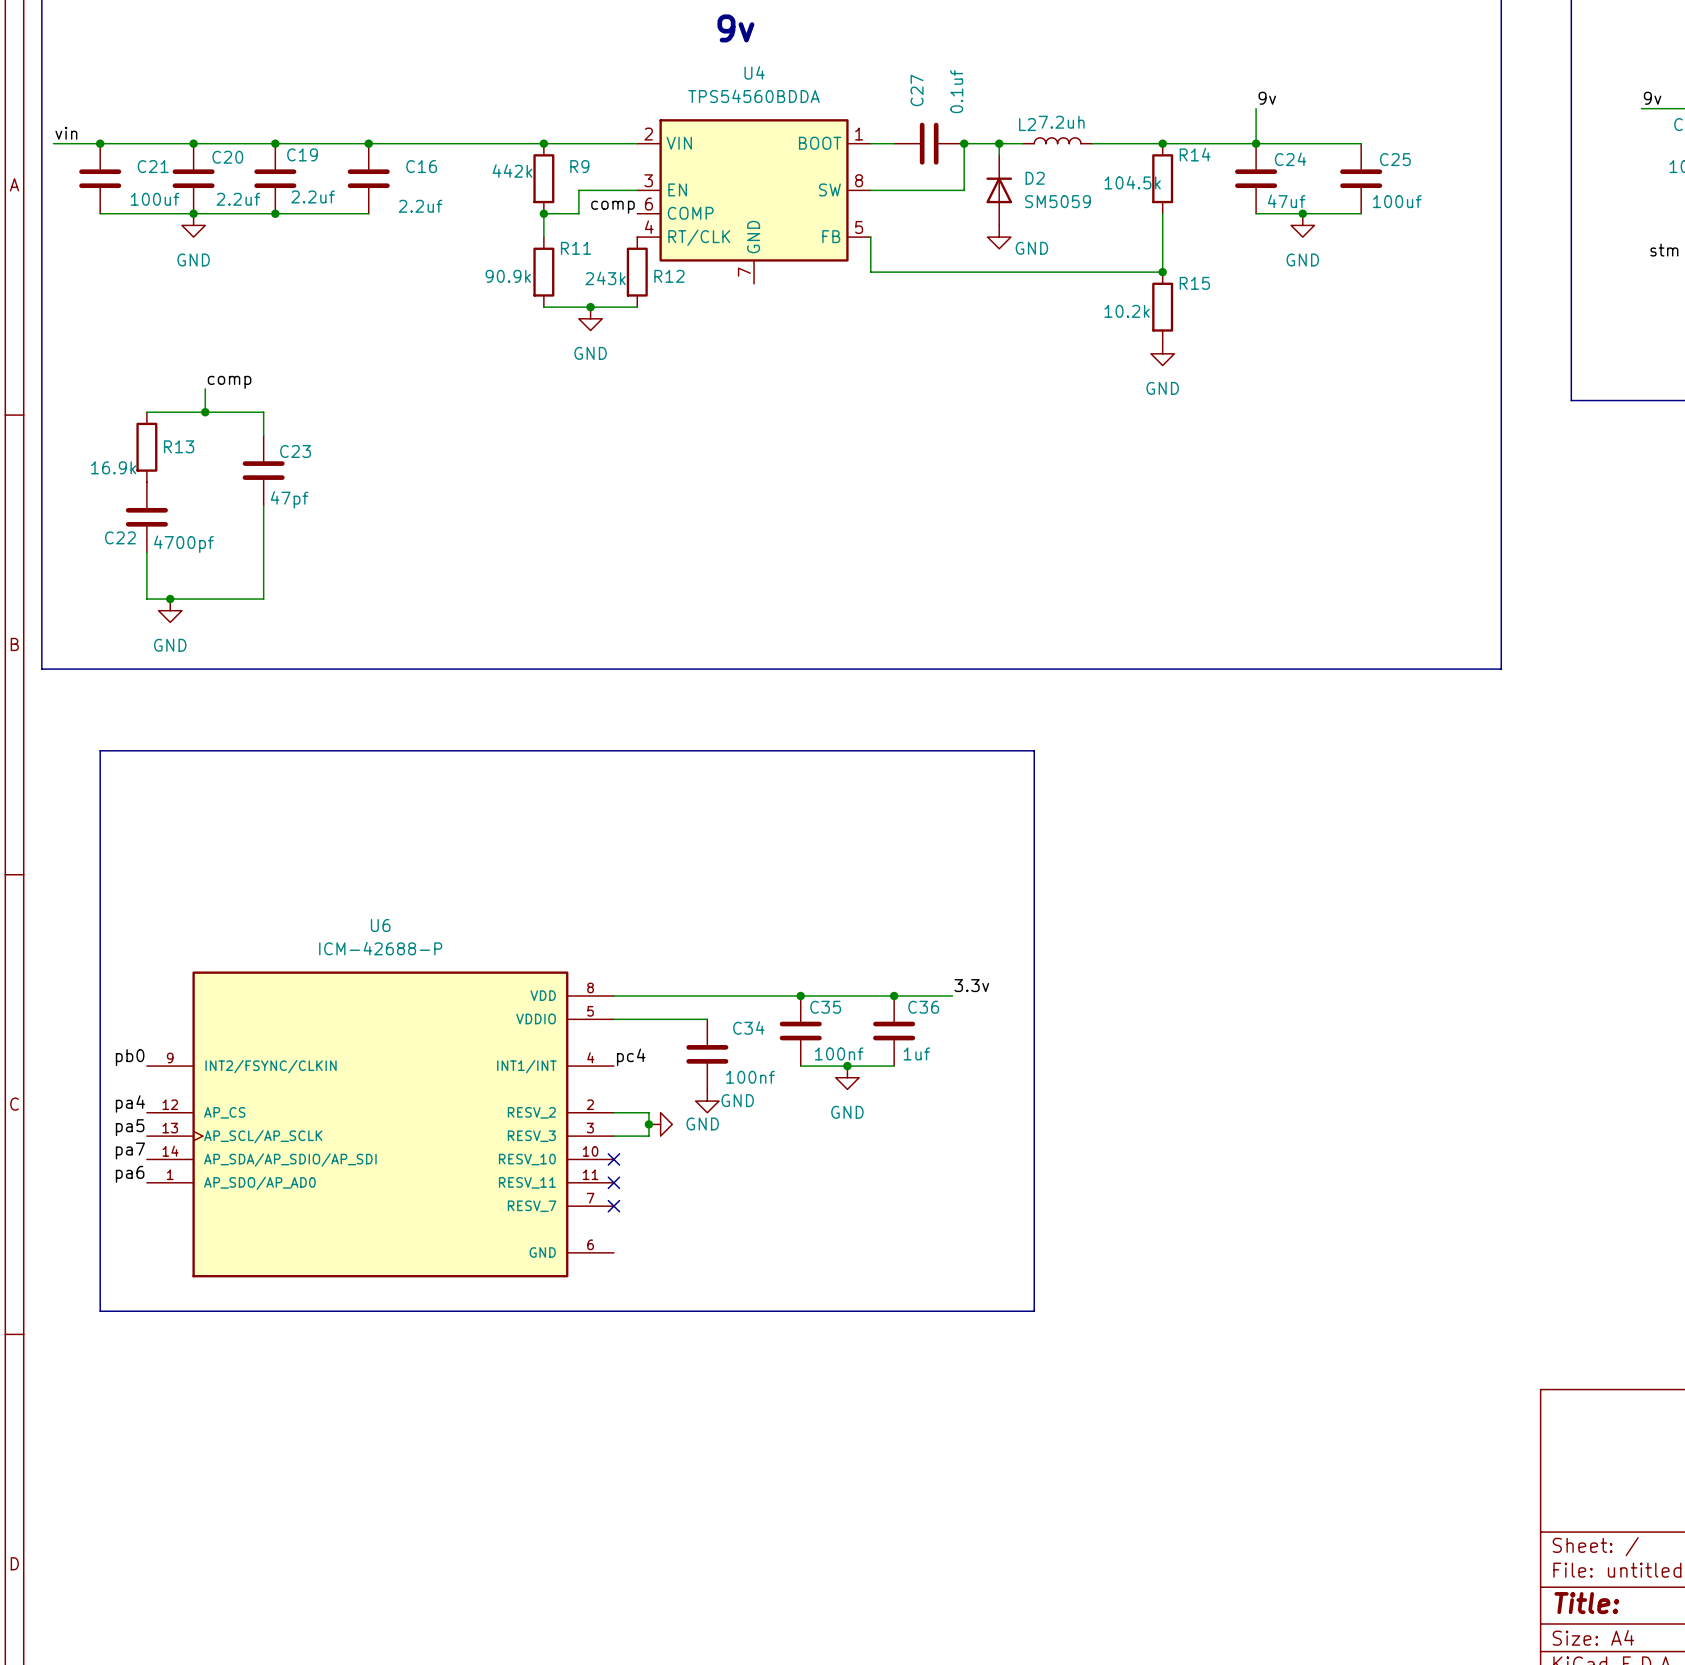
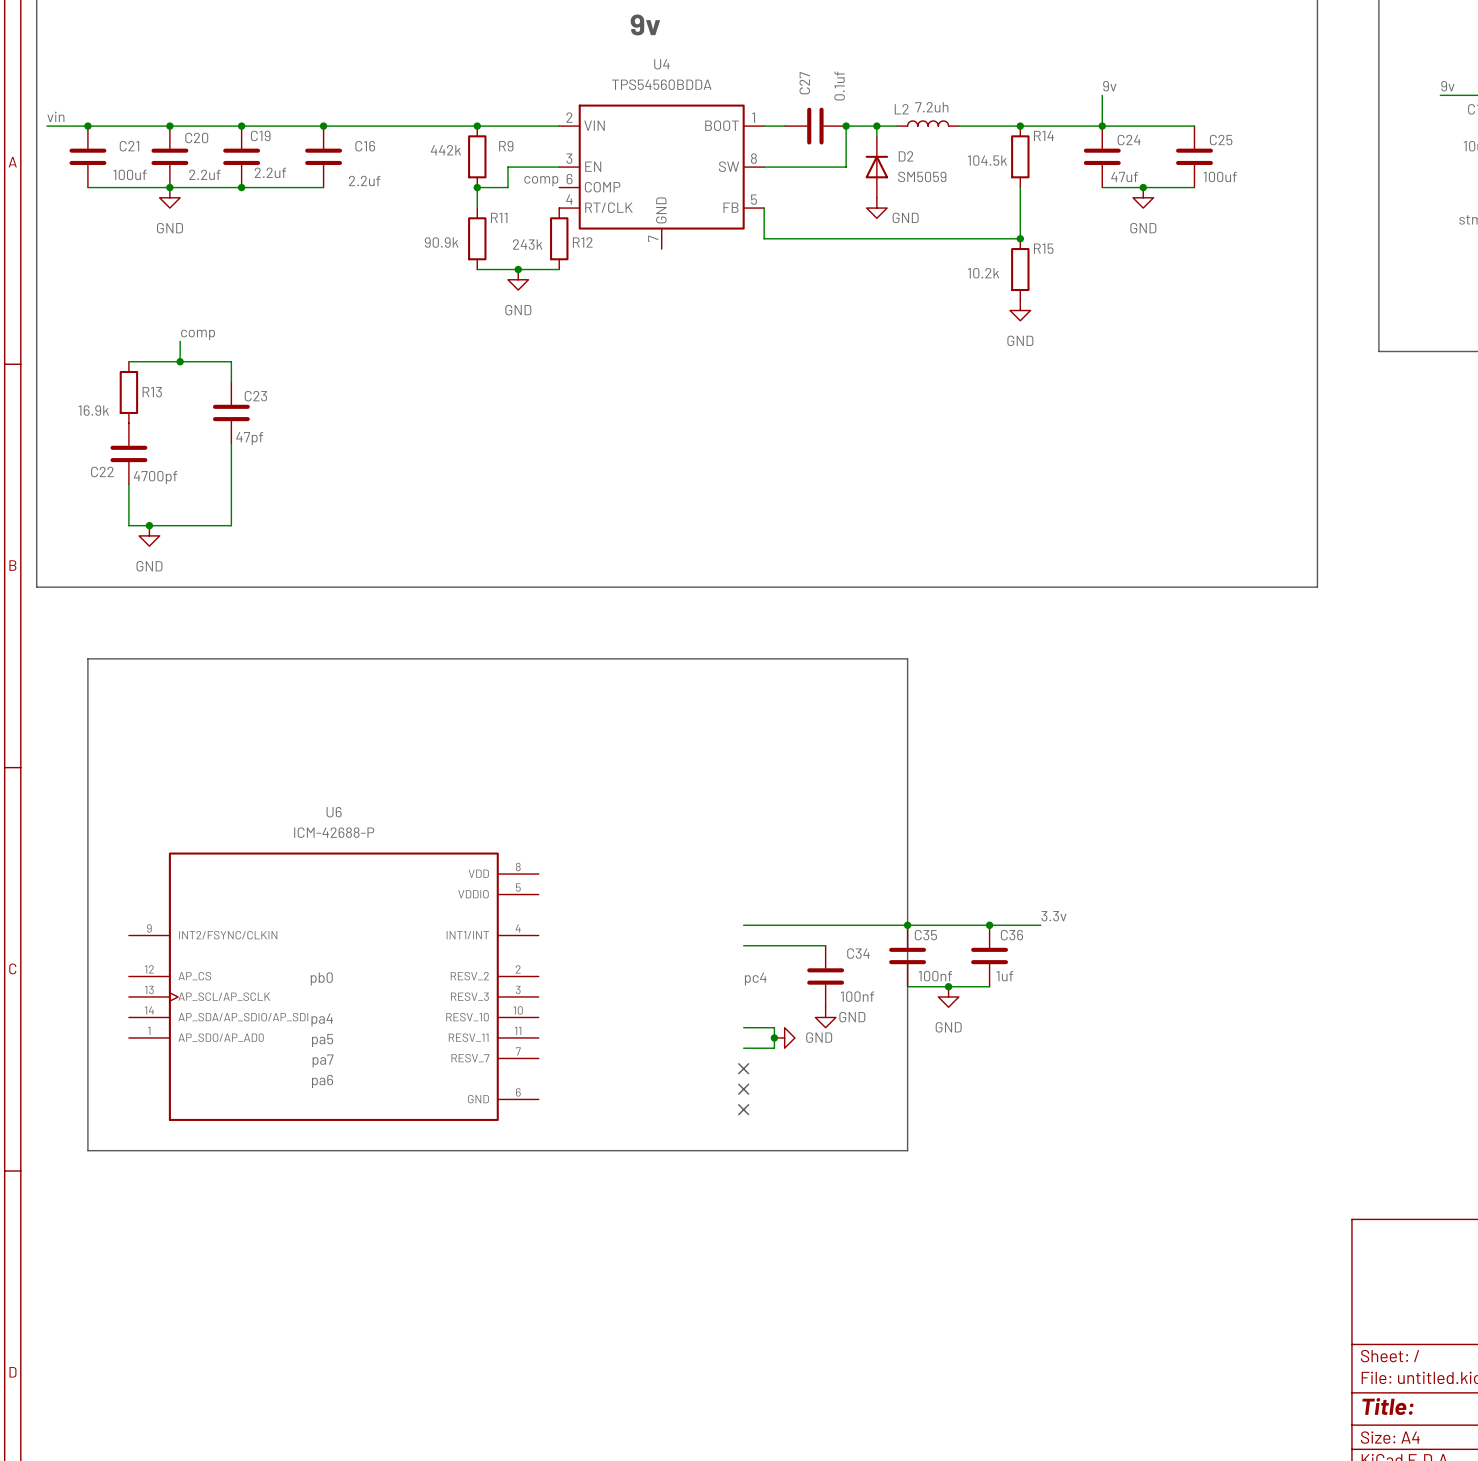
label: 3.3v (971, 985) -> none
wire: (613, 995) (952, 995) -> none
junction: (800, 995) -> none
junction: (894, 995) -> none
wire: (613, 1019) (707, 1019) -> none
C35 position: (800, 1031) -> (907, 956)
C36 position: (894, 1031) -> (989, 956)
label: none -> 3.3v (1054, 916)
C34 position: (707, 1054) -> (825, 976)
wire: none -> (743, 925) (1040, 925)
junction: none -> (907, 925)
junction: none -> (989, 925)
label: pb0 (130, 1057) -> none
label: pc4 (631, 1057) -> none
wire: (800, 1066) (894, 1066) -> (743, 945) (825, 945)
junction: (847, 1066) -> none
power symbol: GND (847, 1077) -> none
power symbol: GND (707, 1101) -> none
label: pa4 (130, 1104) -> none
wire: (613, 1112) (648, 1112) (648, 1136) (613, 1136) -> none
label: none -> pb0 (321, 978)
label: none -> pc4 (755, 979)
junction: (648, 1124) -> none
power symbol: GND (660, 1124) -> none
wire: none -> (907, 986) (989, 986)
junction: none -> (948, 986)
label: pa5 (130, 1127) -> none
power symbol: none -> GND (948, 996)
label: pa7 (130, 1150) -> none
no-connect mark: (613, 1159) -> none
power symbol: none -> GND (825, 1017)
label: none -> pa4 (322, 1020)
wire: none -> (743, 1027) (774, 1027) (774, 1048) (743, 1048)
label: pa6 (130, 1174) -> none
no-connect mark: (613, 1182) -> none
junction: none -> (774, 1037)
power symbol: none -> GND (784, 1037)
label: none -> pa5 (322, 1040)
no-connect mark: (613, 1206) -> none
label: none -> pa7 (323, 1060)
no-connect mark: none -> (743, 1068)
label: none -> pa6 (322, 1081)
no-connect mark: none -> (743, 1089)
no-connect mark: none -> (743, 1109)

